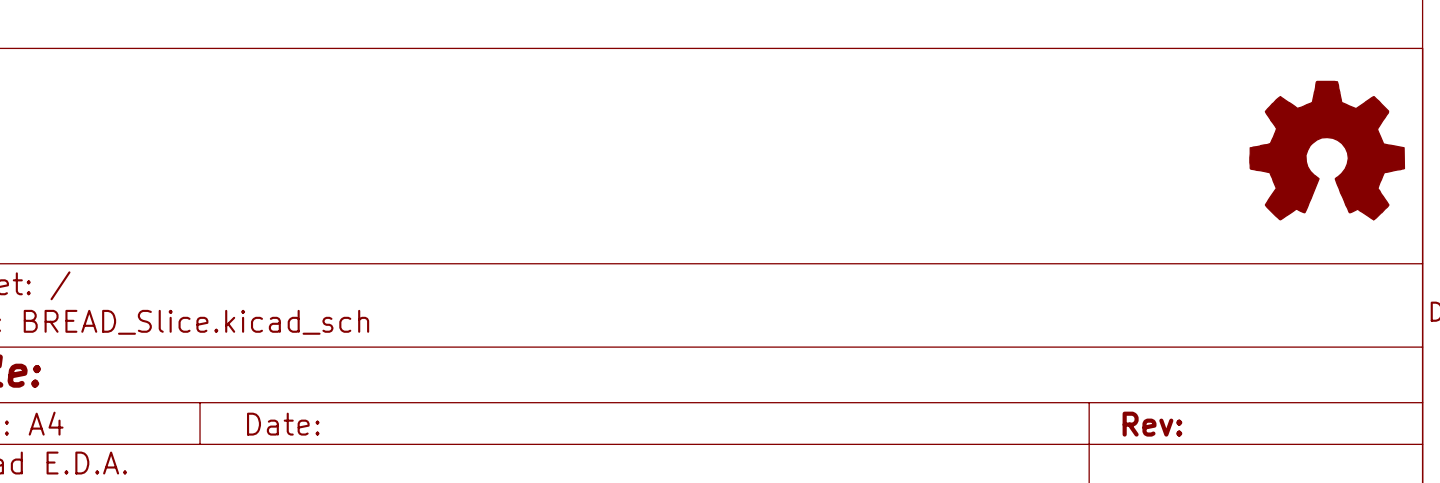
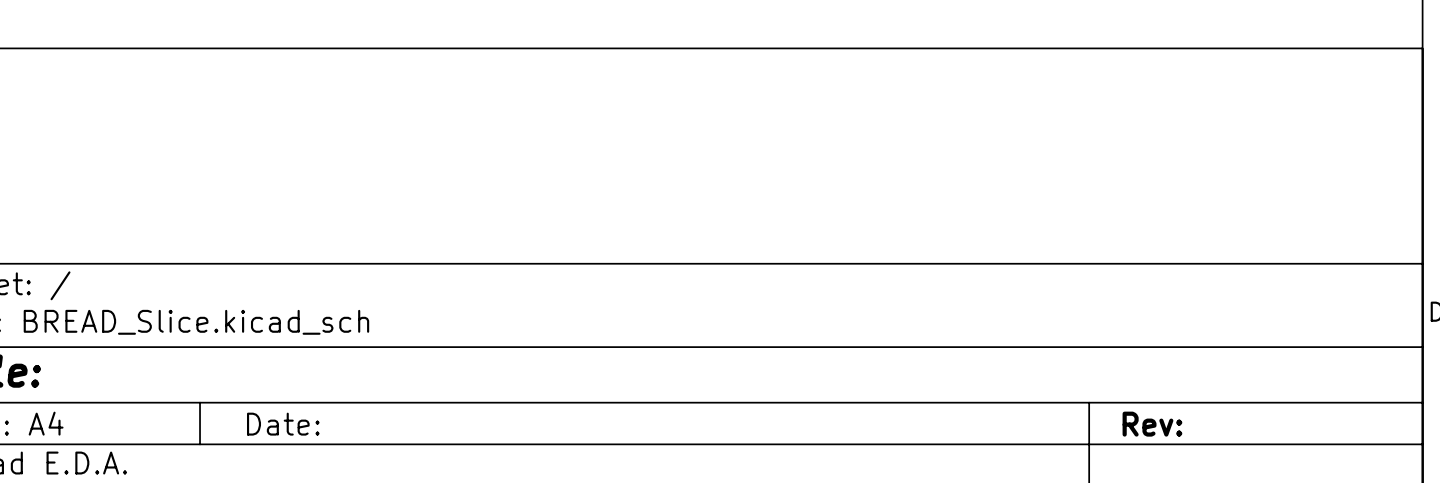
power symbol: (1327, 150) -> none

